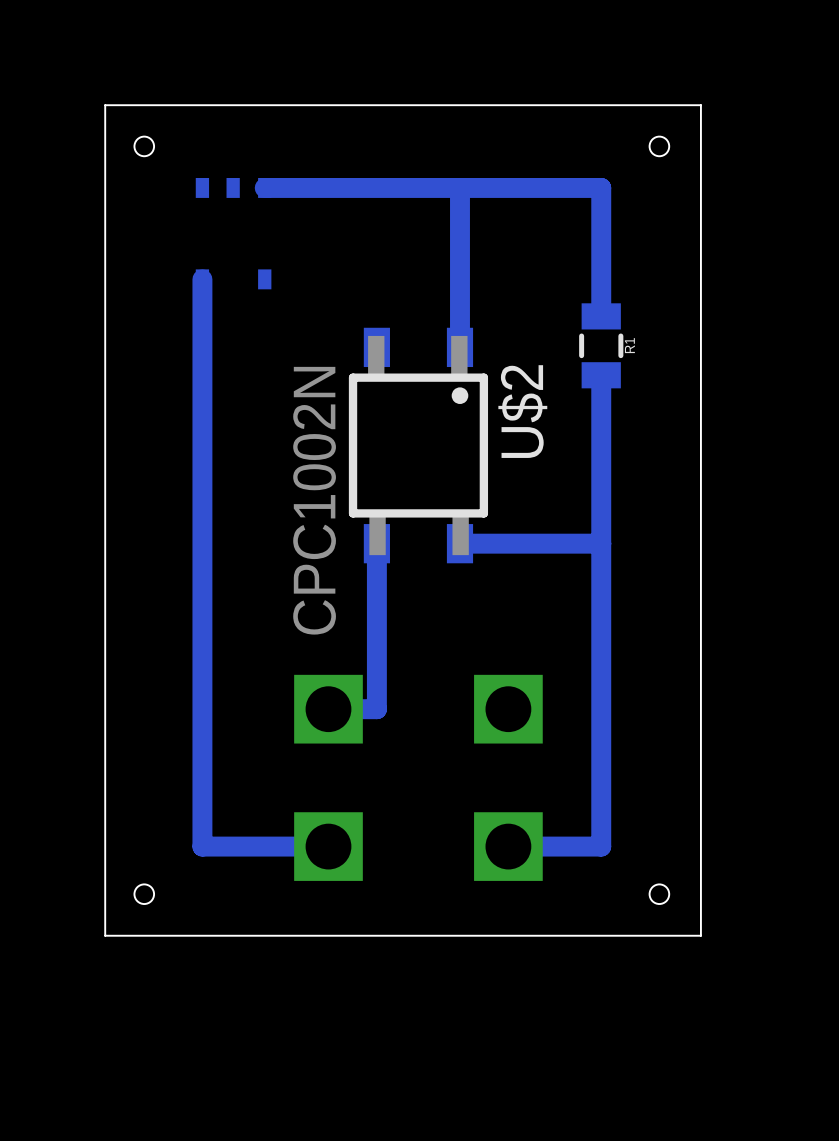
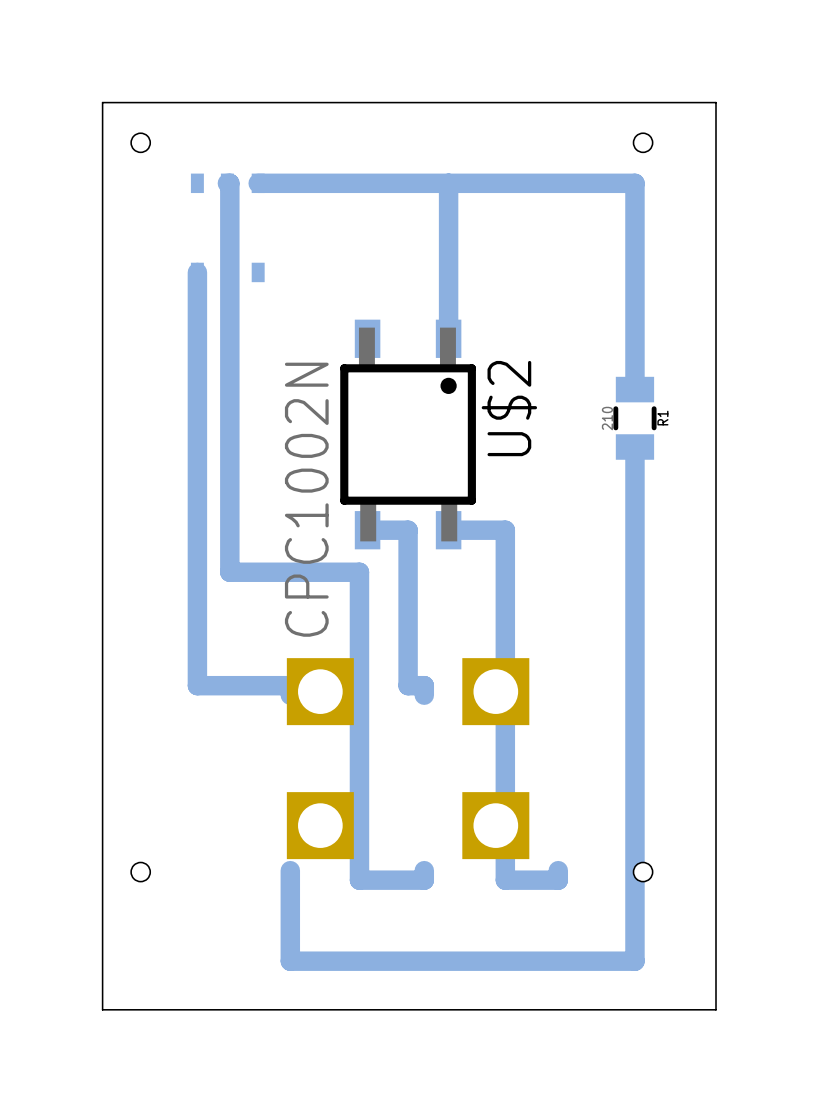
board edge: (700, 105) (700, 935) (105, 935) -> (683, 102) (716, 102) (716, 1009) (102, 1009) (102, 912)
bottom track: none -> (227, 183) (229, 183) (229, 572) (359, 572) (359, 880) (424, 880) (424, 870)
bottom track: (601, 187) (601, 316) -> (586, 183) (634, 183) (634, 389)
R1 position: (601, 345) -> (634, 418)
bottom track: (601, 375) (601, 846) (508, 846) -> none
R1 value: none -> 210 (607, 418)
bottom track: none -> (634, 447) (634, 961) (290, 961) (290, 870)
bottom track: (376, 543) (376, 709) (328, 709) -> (367, 530) (408, 530) (408, 685) (424, 685) (424, 695)
bottom track: (601, 543) (518, 543) -> (558, 870) (558, 880) (505, 880) (505, 530)
bottom track: (202, 703) (202, 846) (328, 846) -> (197, 685) (290, 685) (290, 695)

